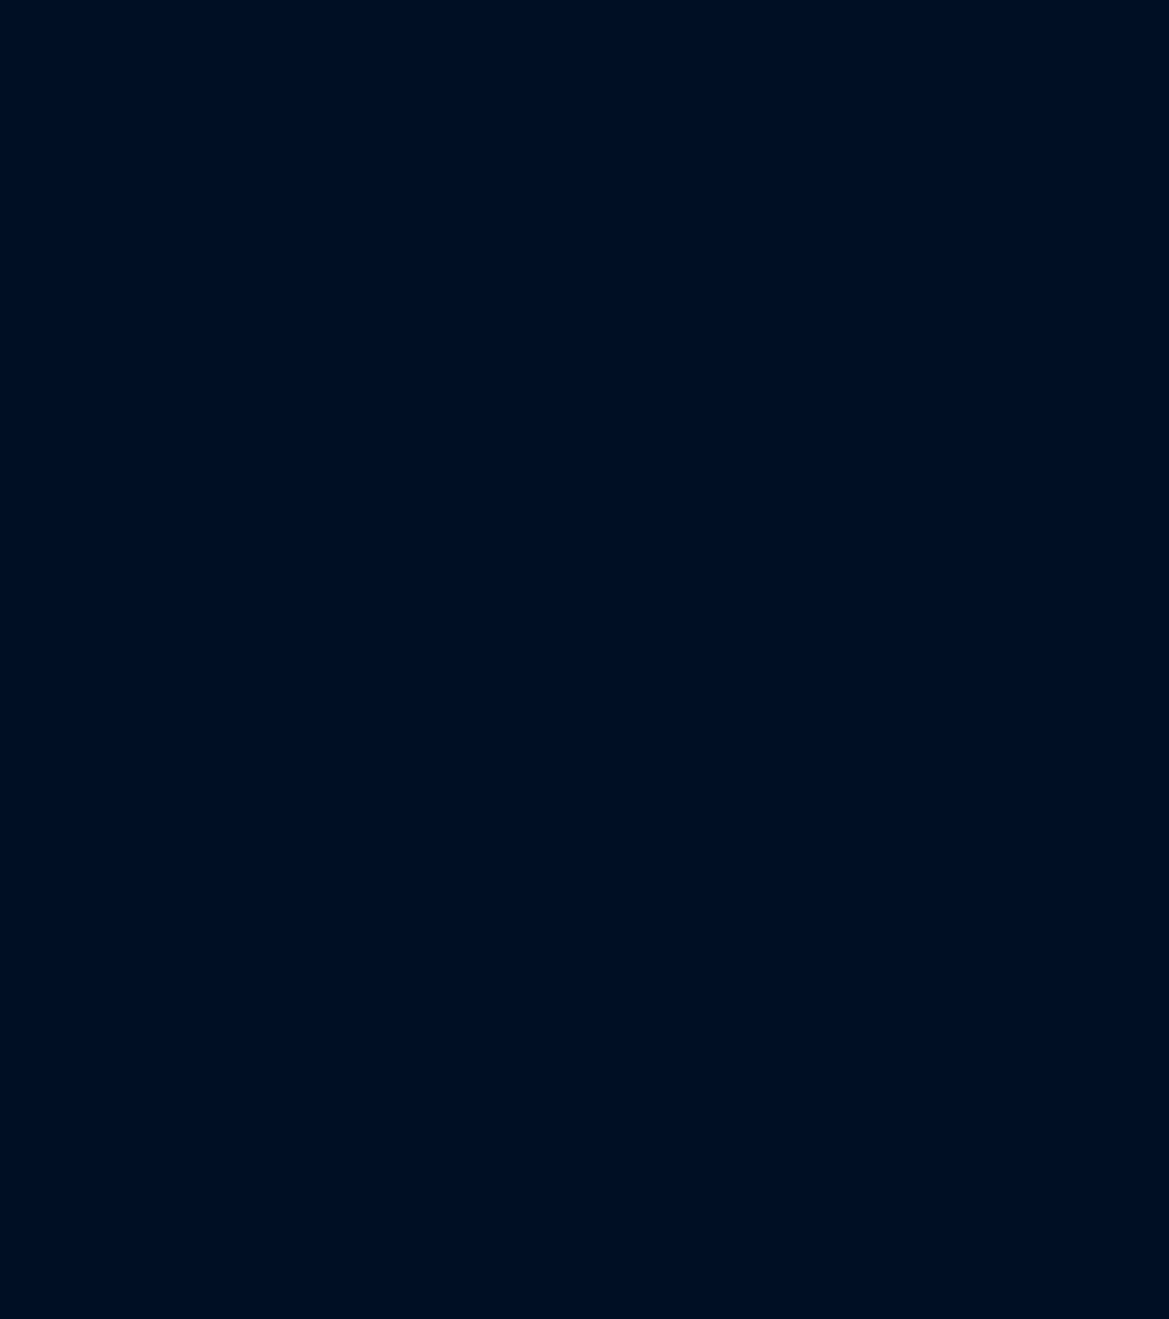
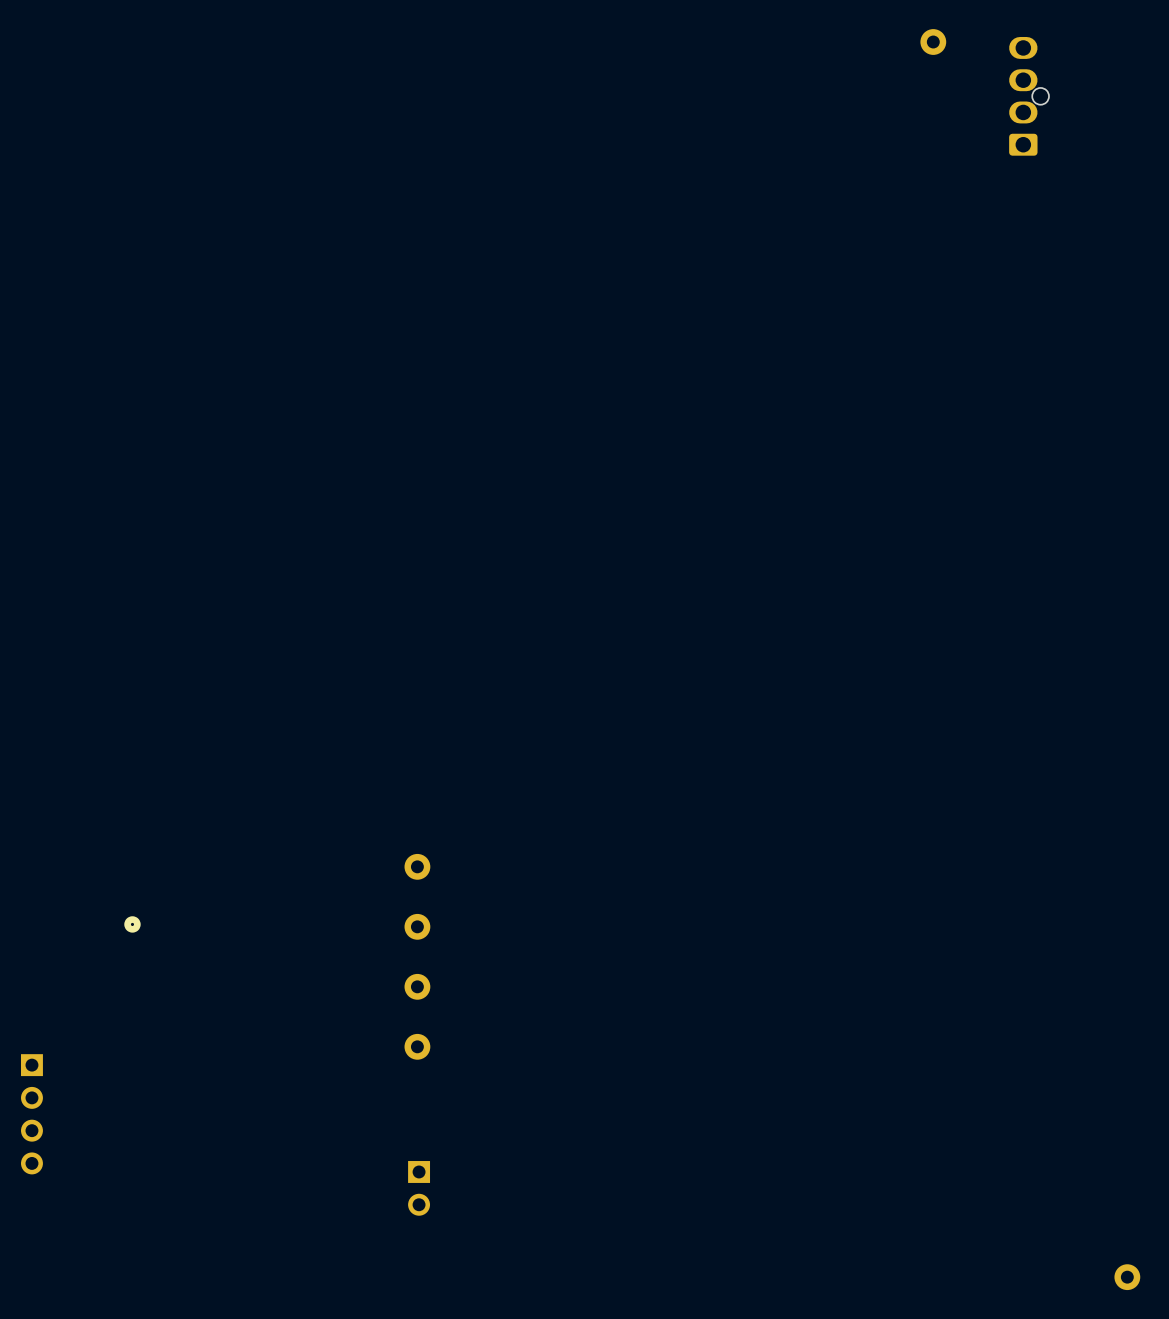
part: none -> (933, 42)
part: none -> (1029, 96)
part: none -> (417, 866)
part: none -> (132, 924)
part: none -> (417, 926)
part: none -> (417, 986)
part: none -> (417, 1046)
part: none -> (31, 1114)
part: none -> (419, 1188)
part: none -> (1127, 1277)

